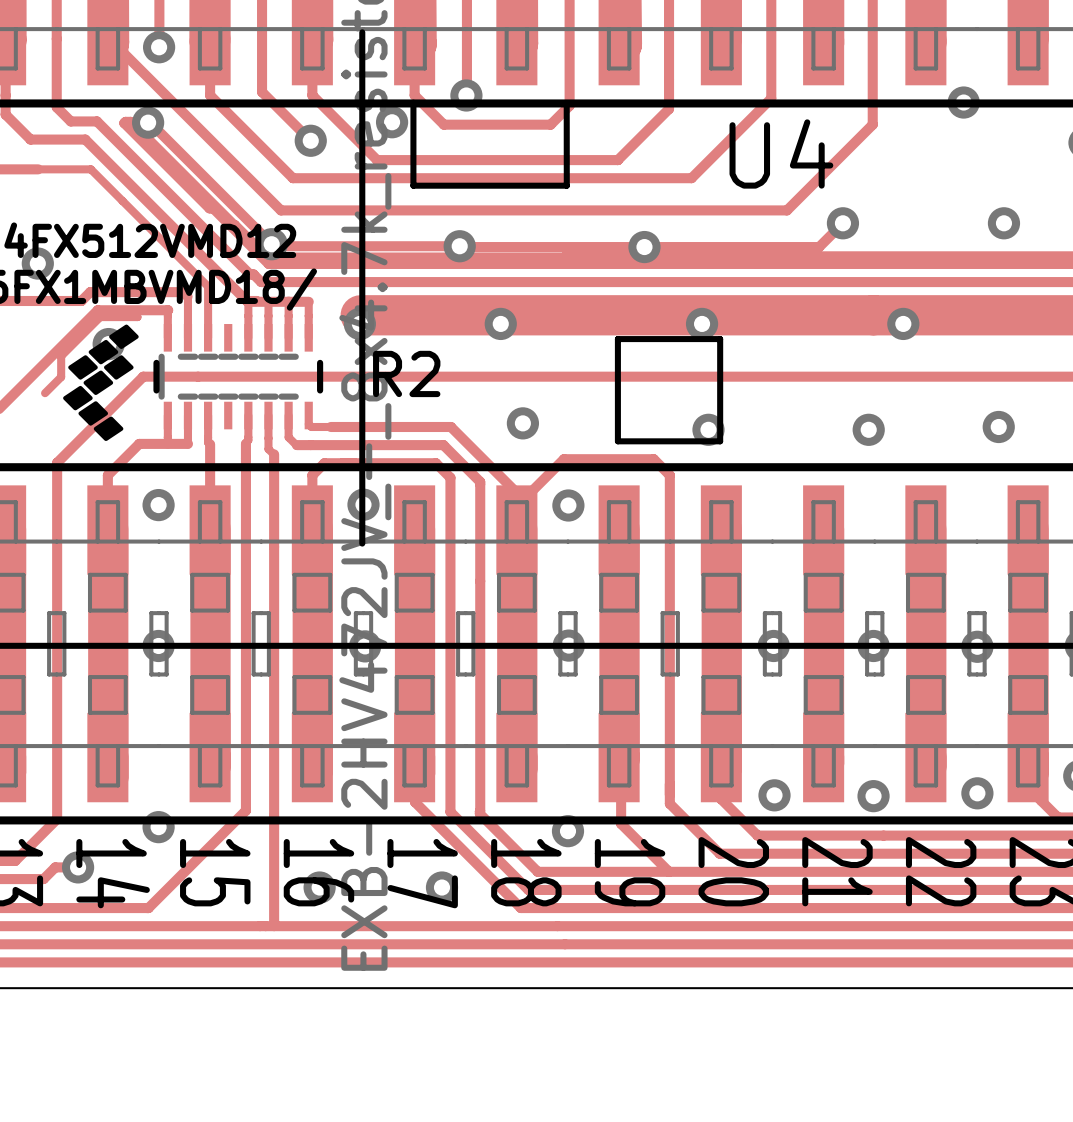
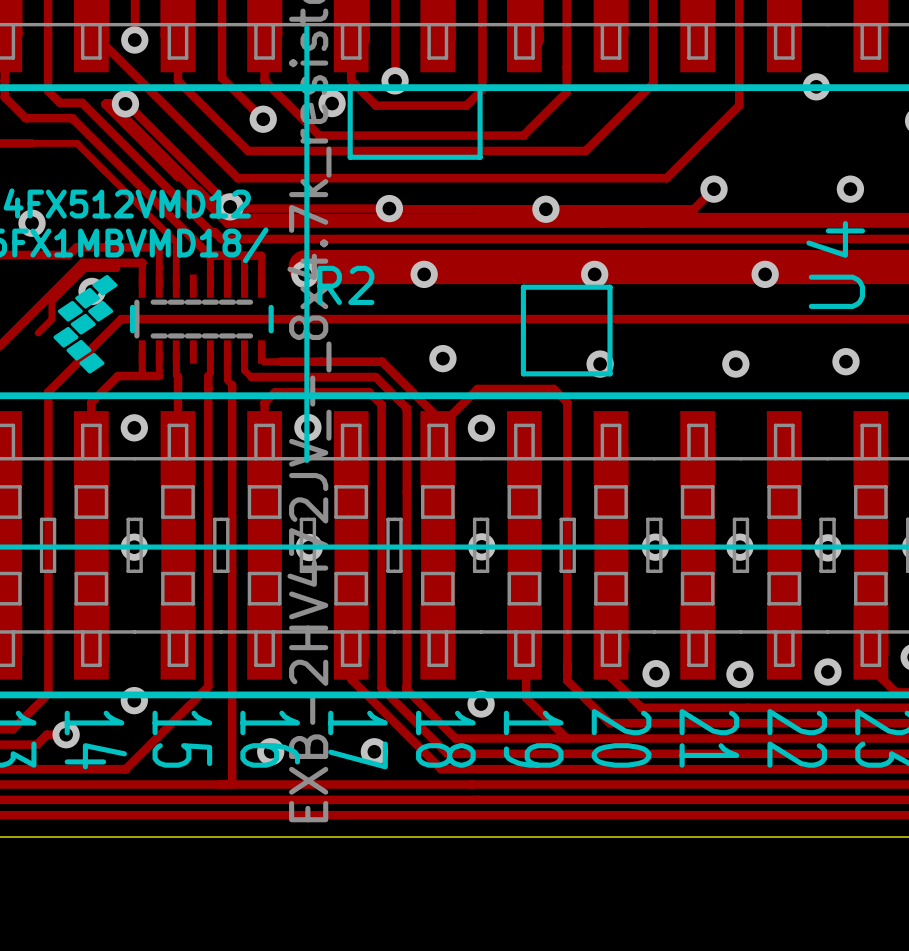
U4 name rotation: 0° (781, 153) -> 90° counterclockwise (835, 265)
U4 name position: U4 (781, 153) -> U4 (835, 265)
R2 name position: R2 (406, 373) -> R2 (345, 285)

